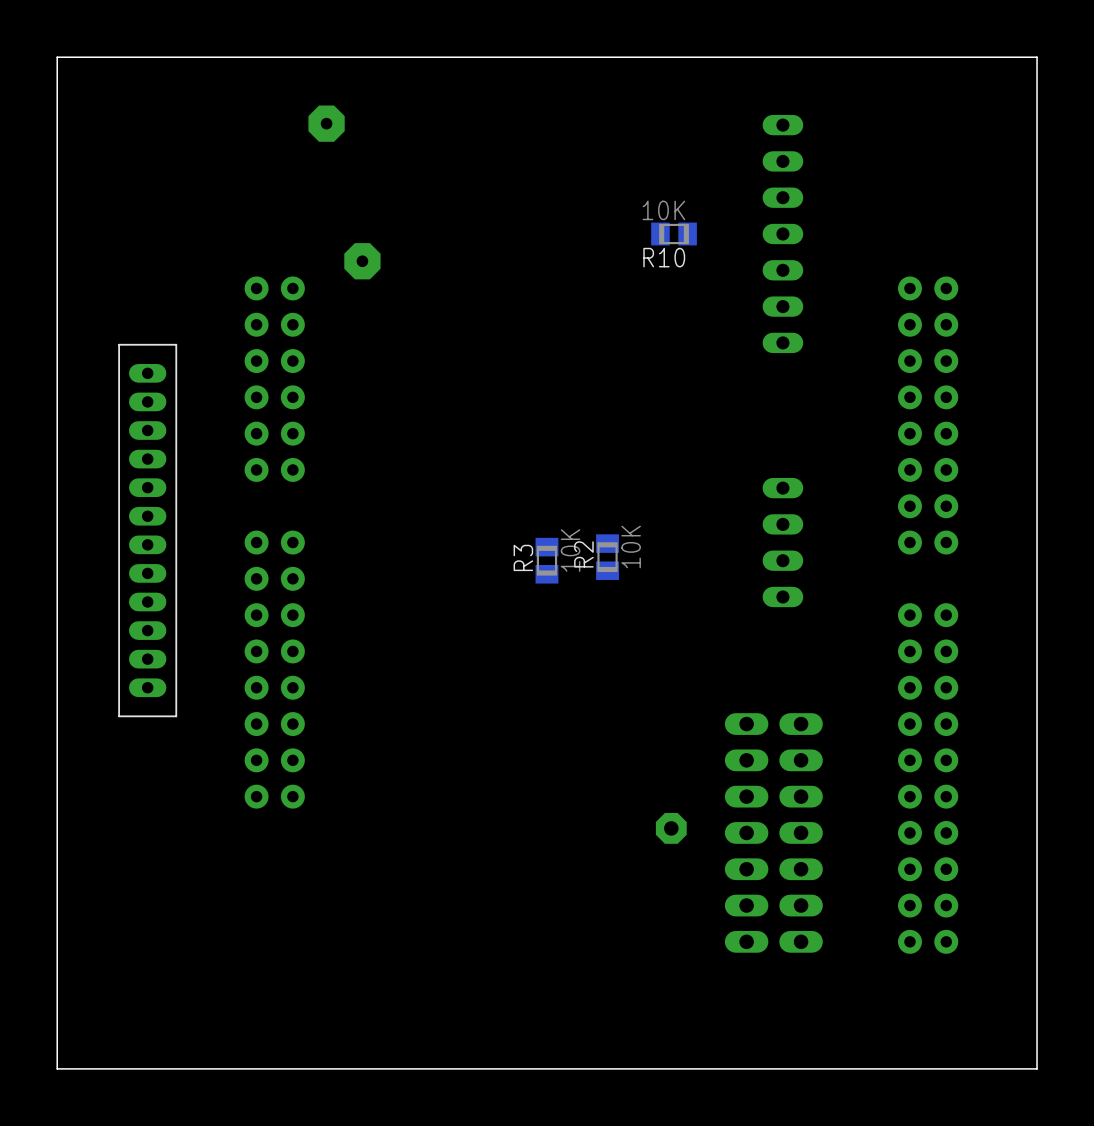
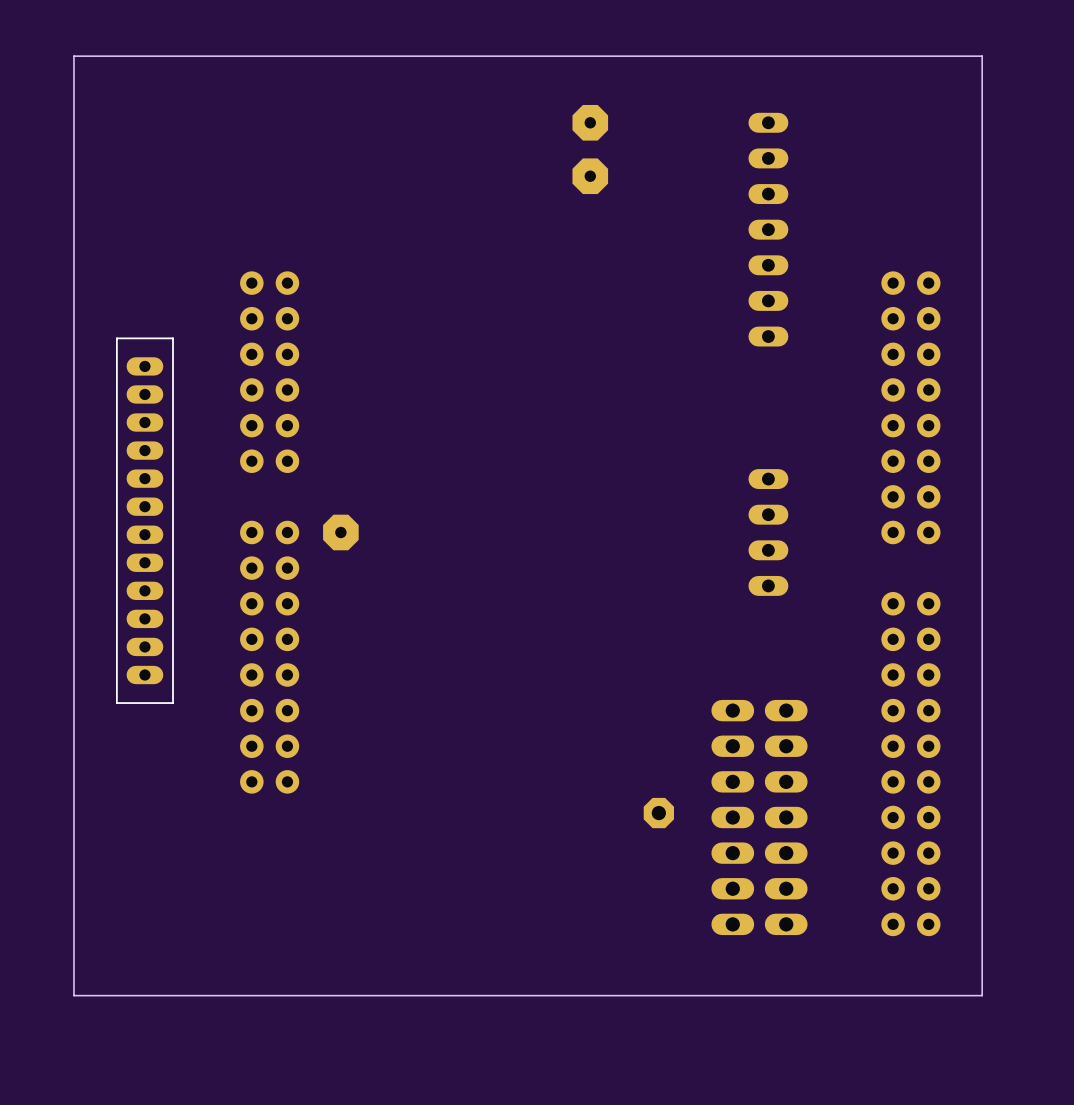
board edge: (1000, 57) (1037, 57) (1037, 1068) (57, 1068) (57, 57) (75, 57) -> (982, 56) (982, 995) (73, 995) (73, 56)
part: (326, 123) -> none
part: none -> (590, 122)
part: none -> (590, 176)
R10: 10K (674, 234) -> none
part: (362, 261) -> none
part: none -> (340, 532)
R2: 10K (607, 557) -> none
R3: 10K (546, 560) -> none

